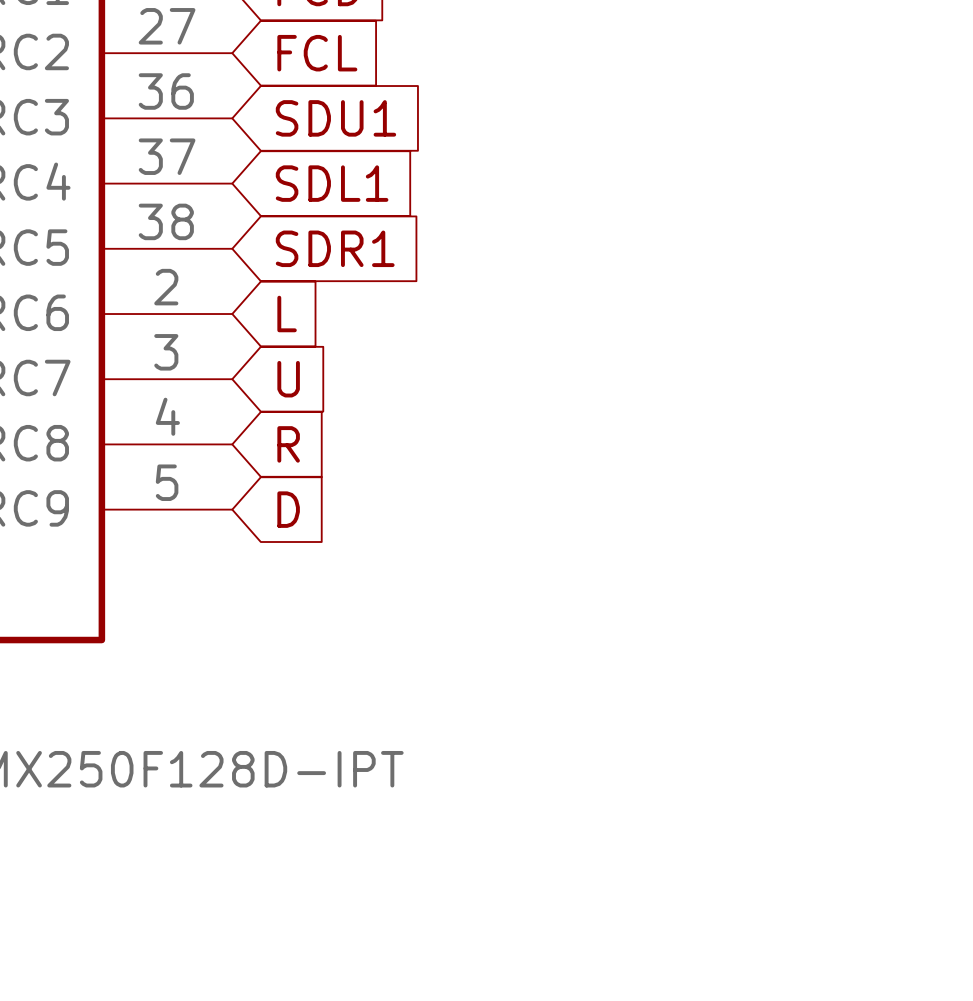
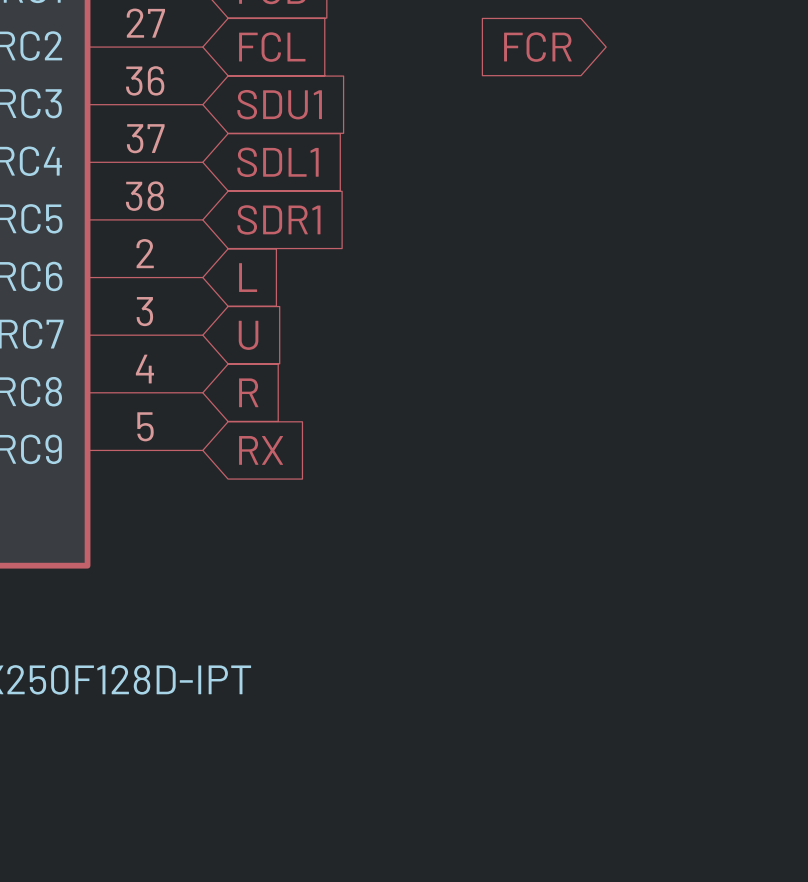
global label: none -> FCR (537, 47)
global label: D (288, 509) -> RX (261, 450)

